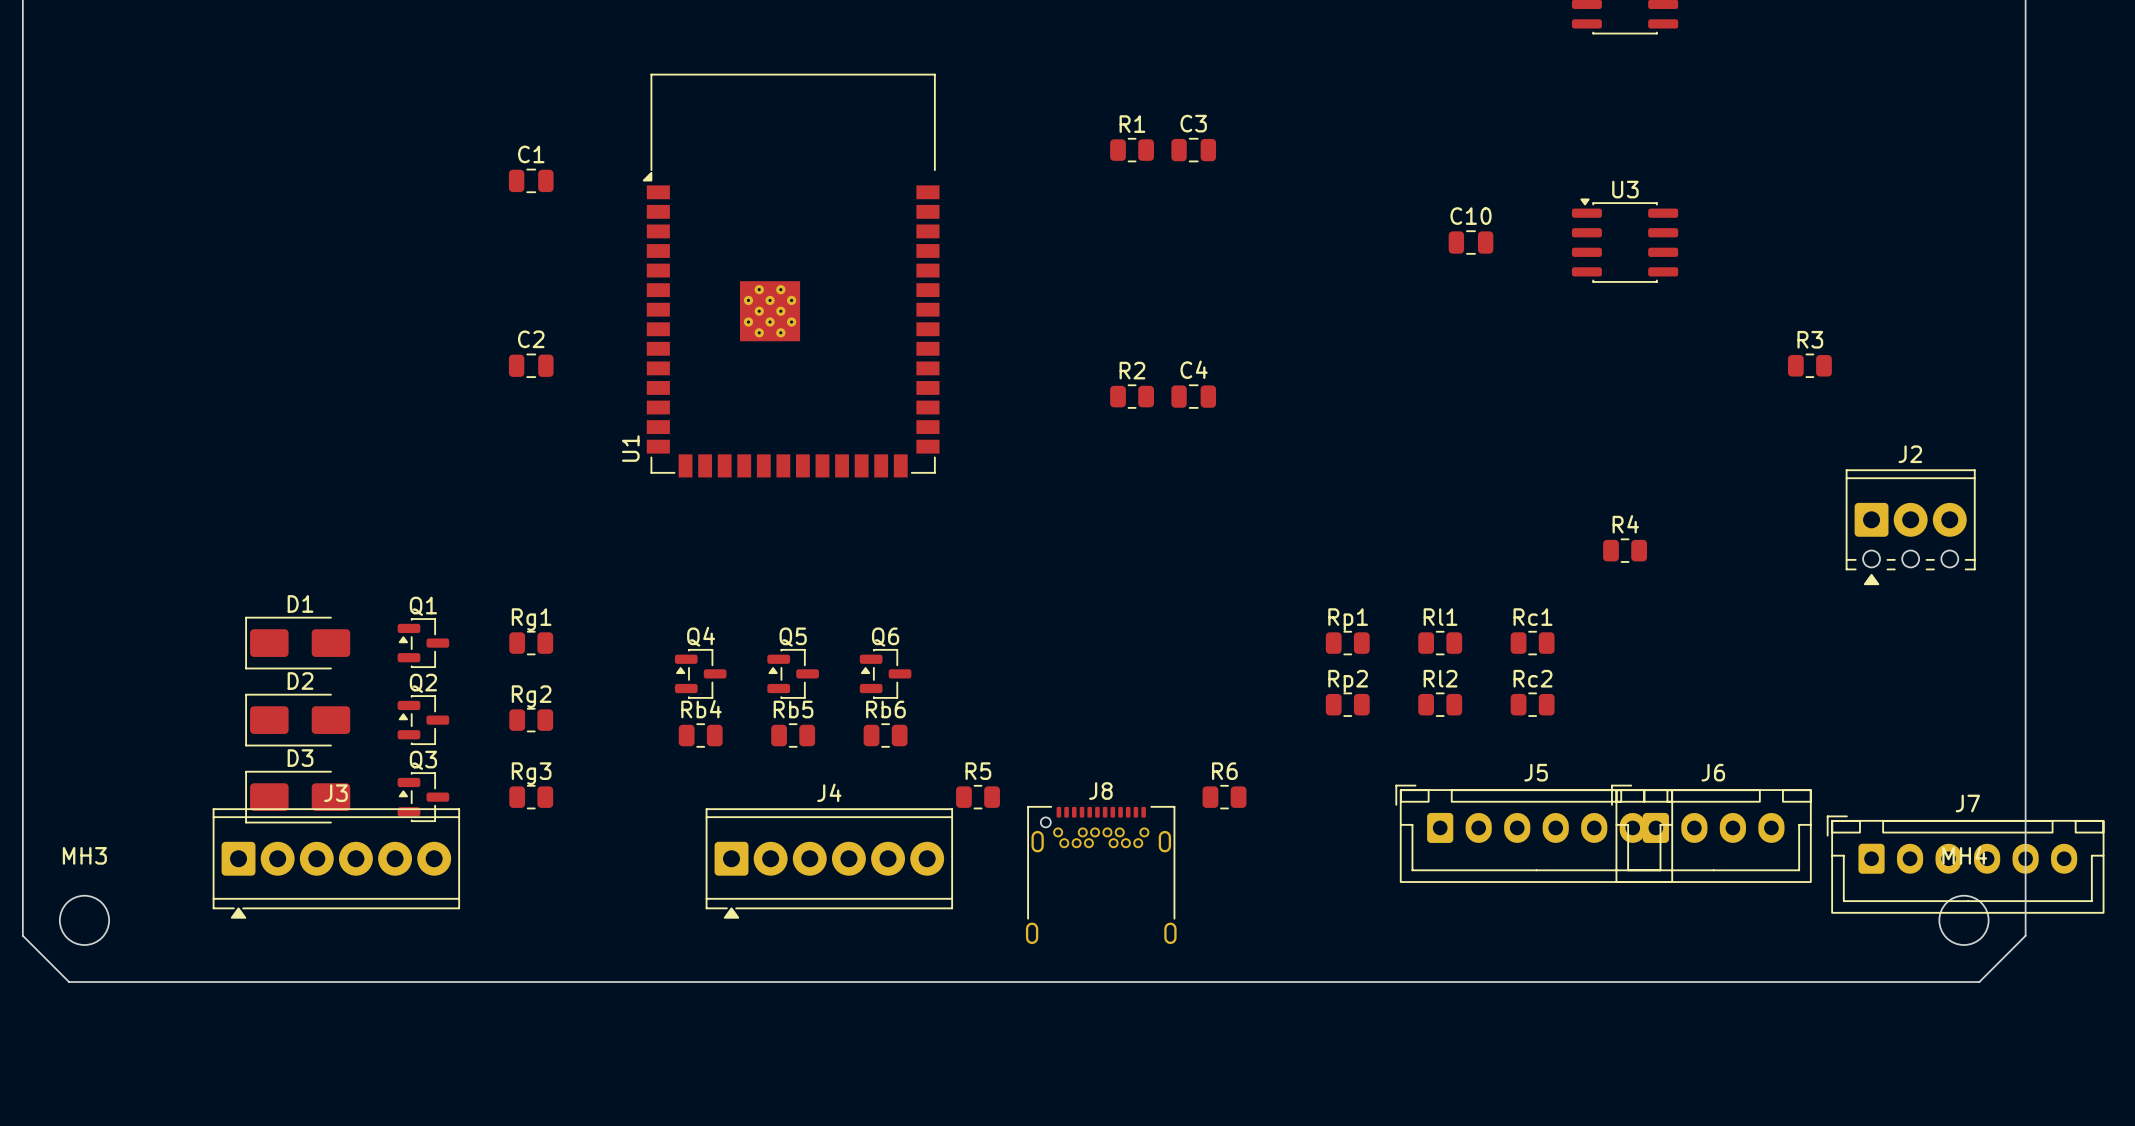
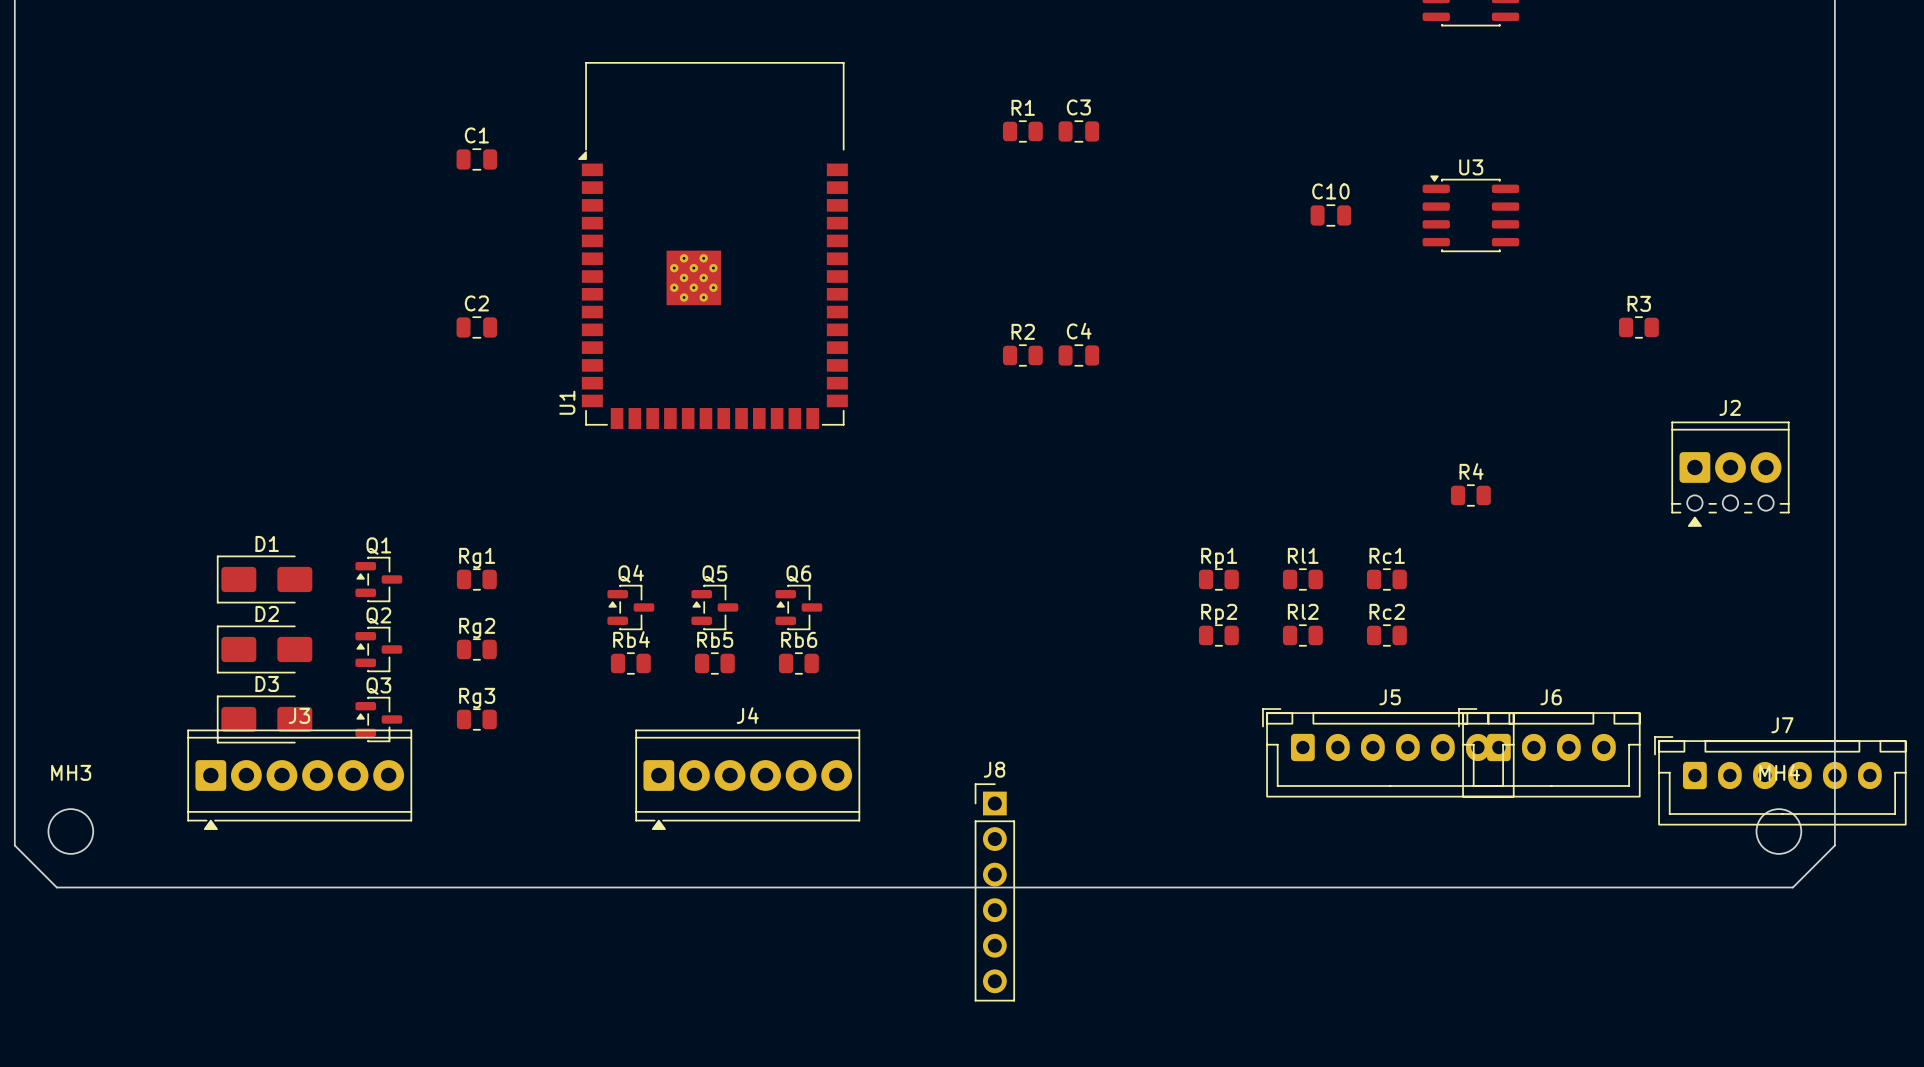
J8 name position: J8 (1100, 791) -> J8 (994, 769)
R5: (978, 797) -> none
R6: (1224, 797) -> none
J8 footprint: [1025, 805, 1177, 945] -> [974, 783, 1016, 1002]

